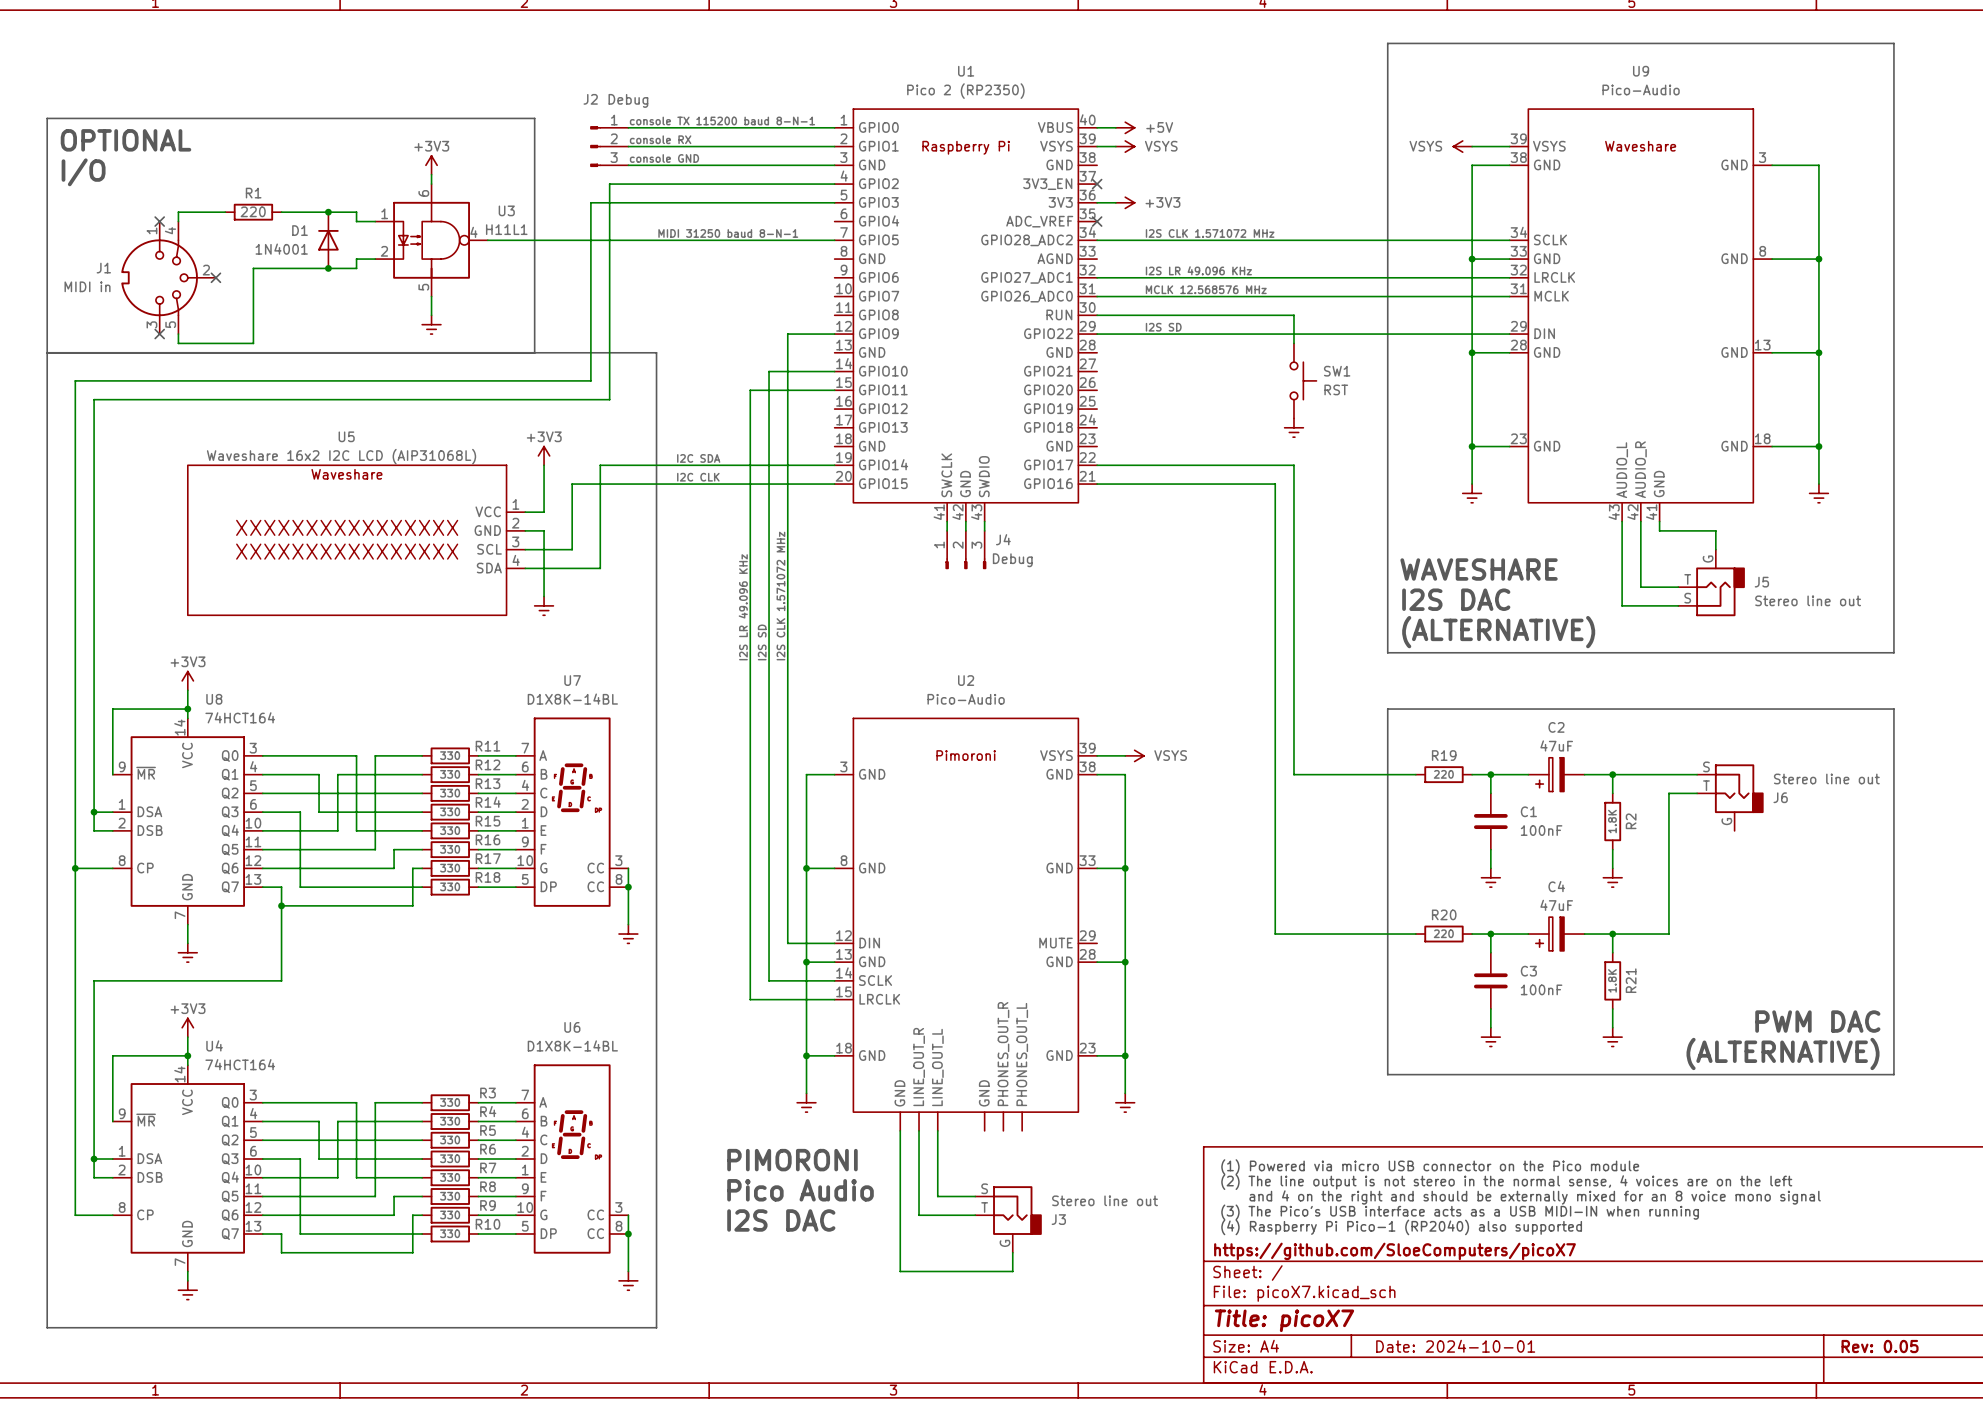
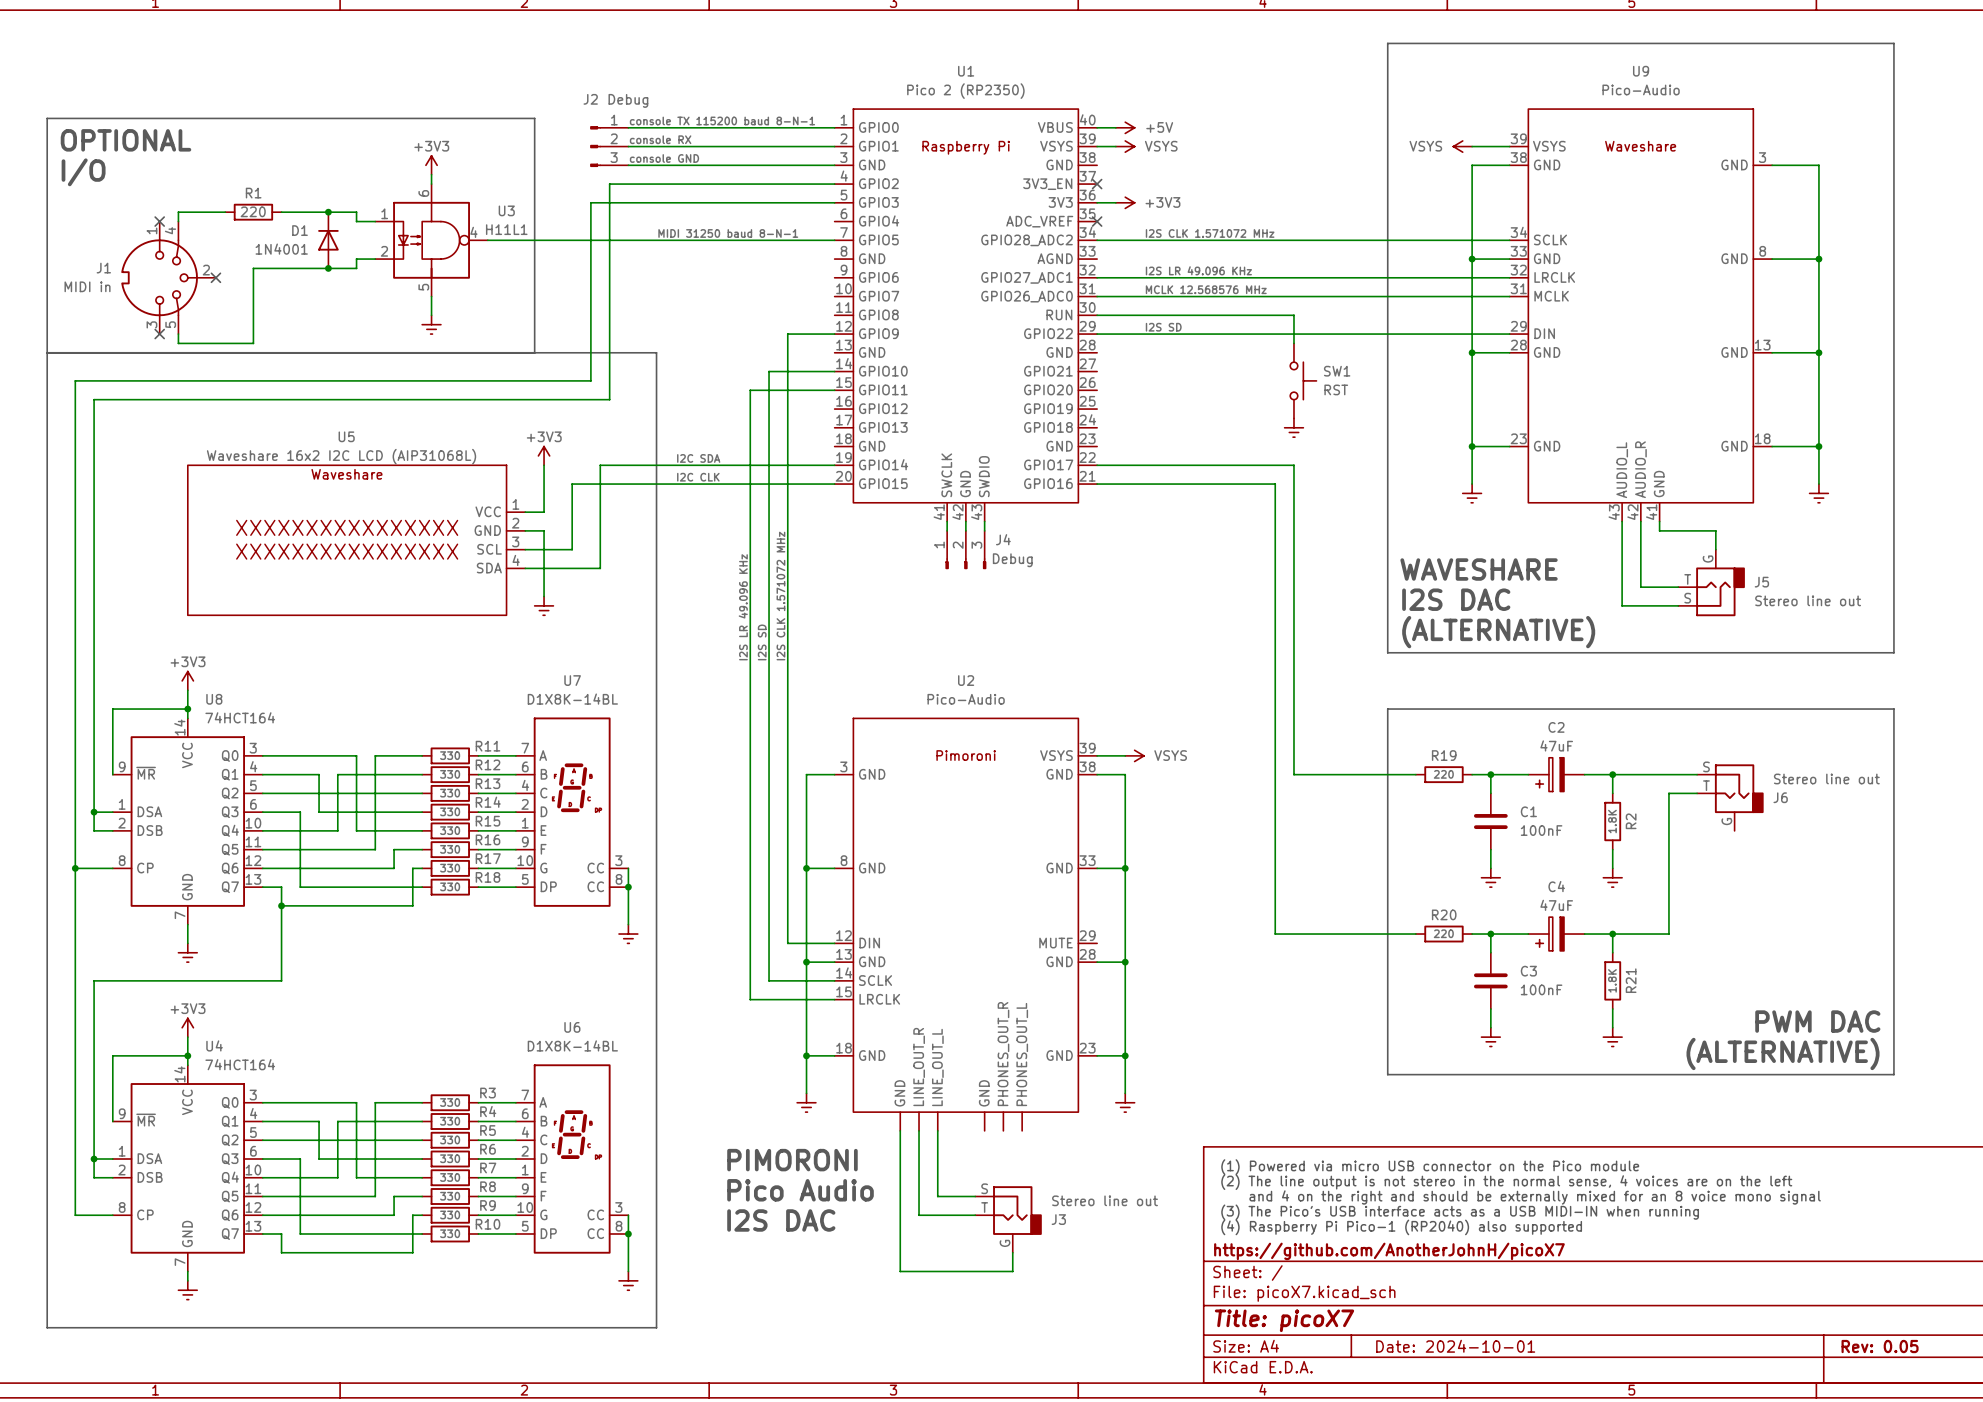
title block: https://github.com/SloeComputers/picoX7 (1394, 1251) -> https://github.com/AnotherJohnH/picoX7 (1389, 1251)

